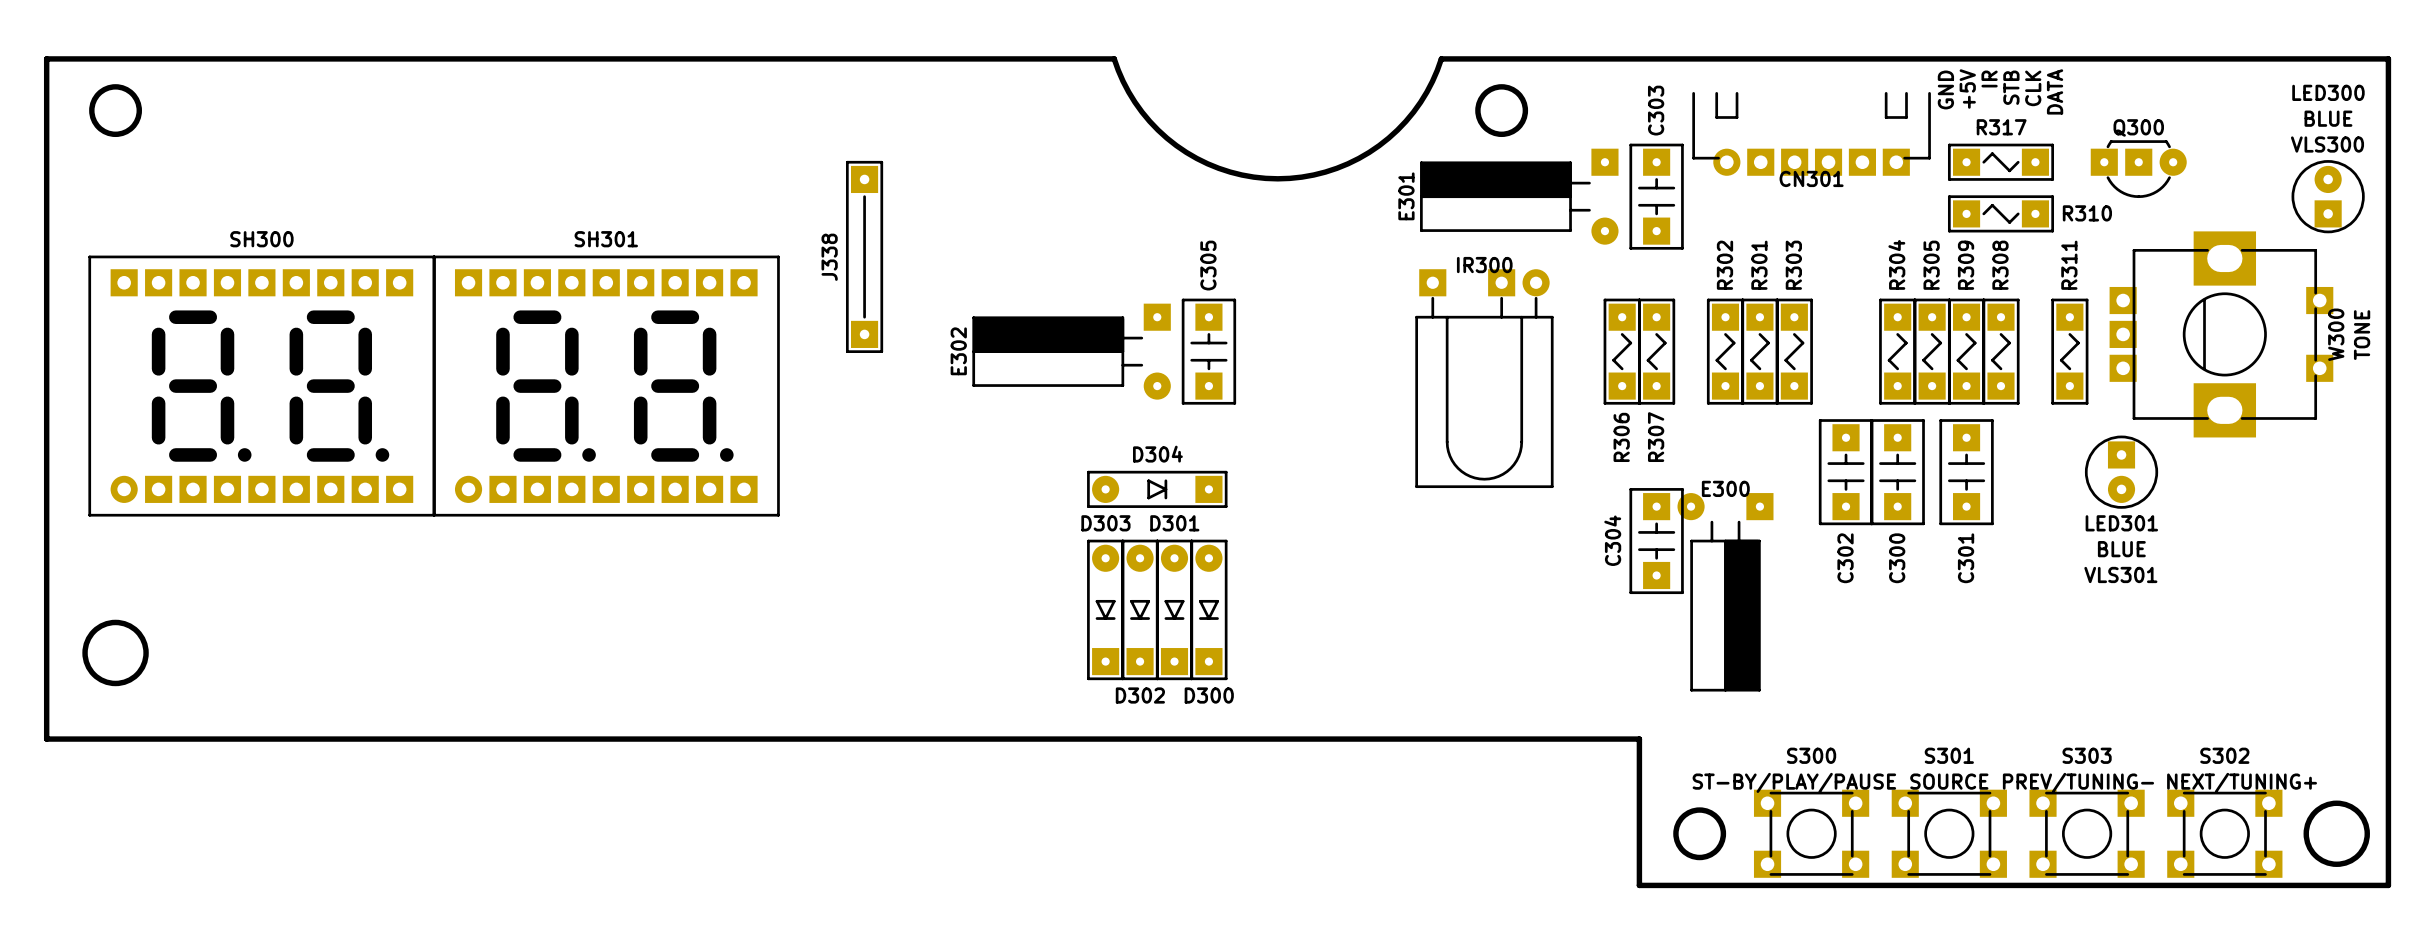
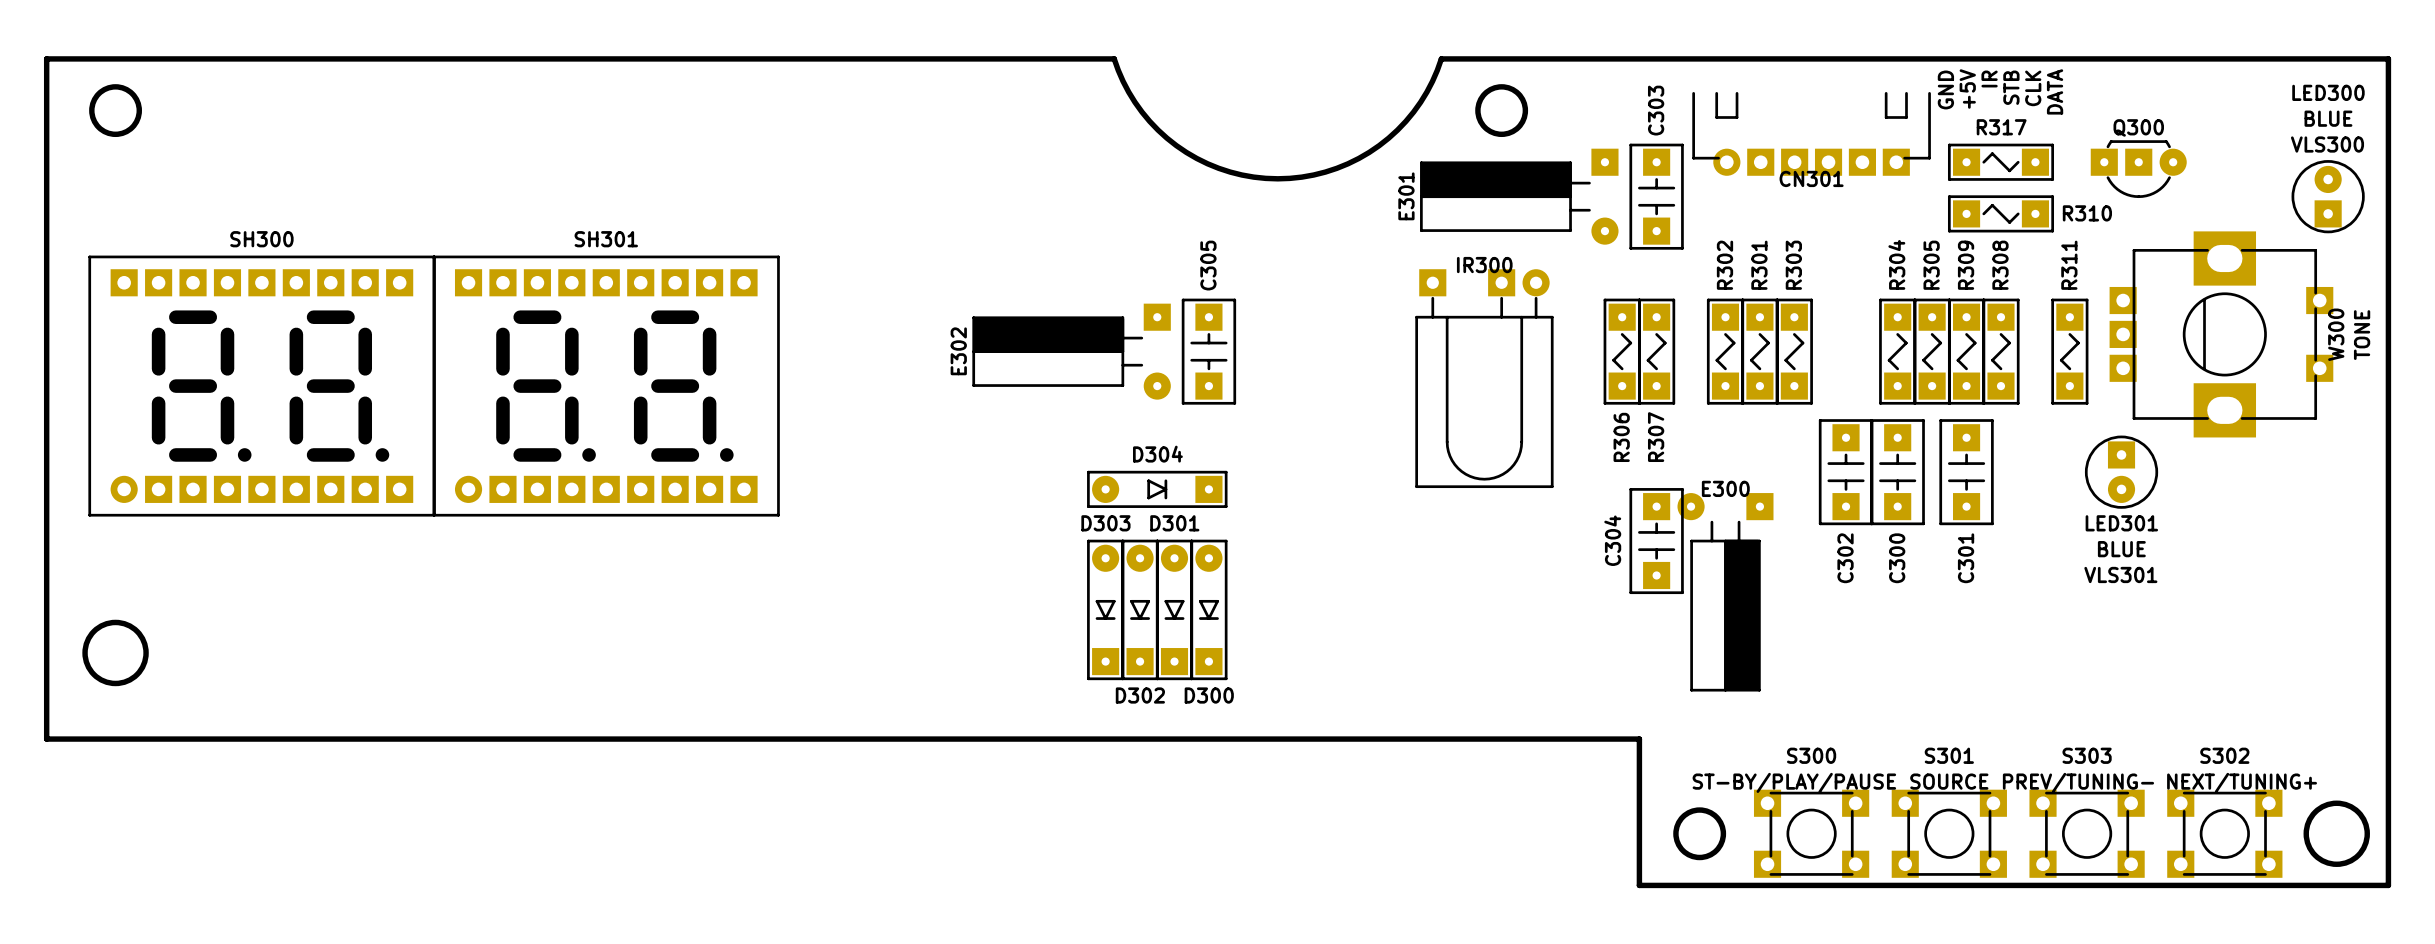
J338: (864, 256) -> none

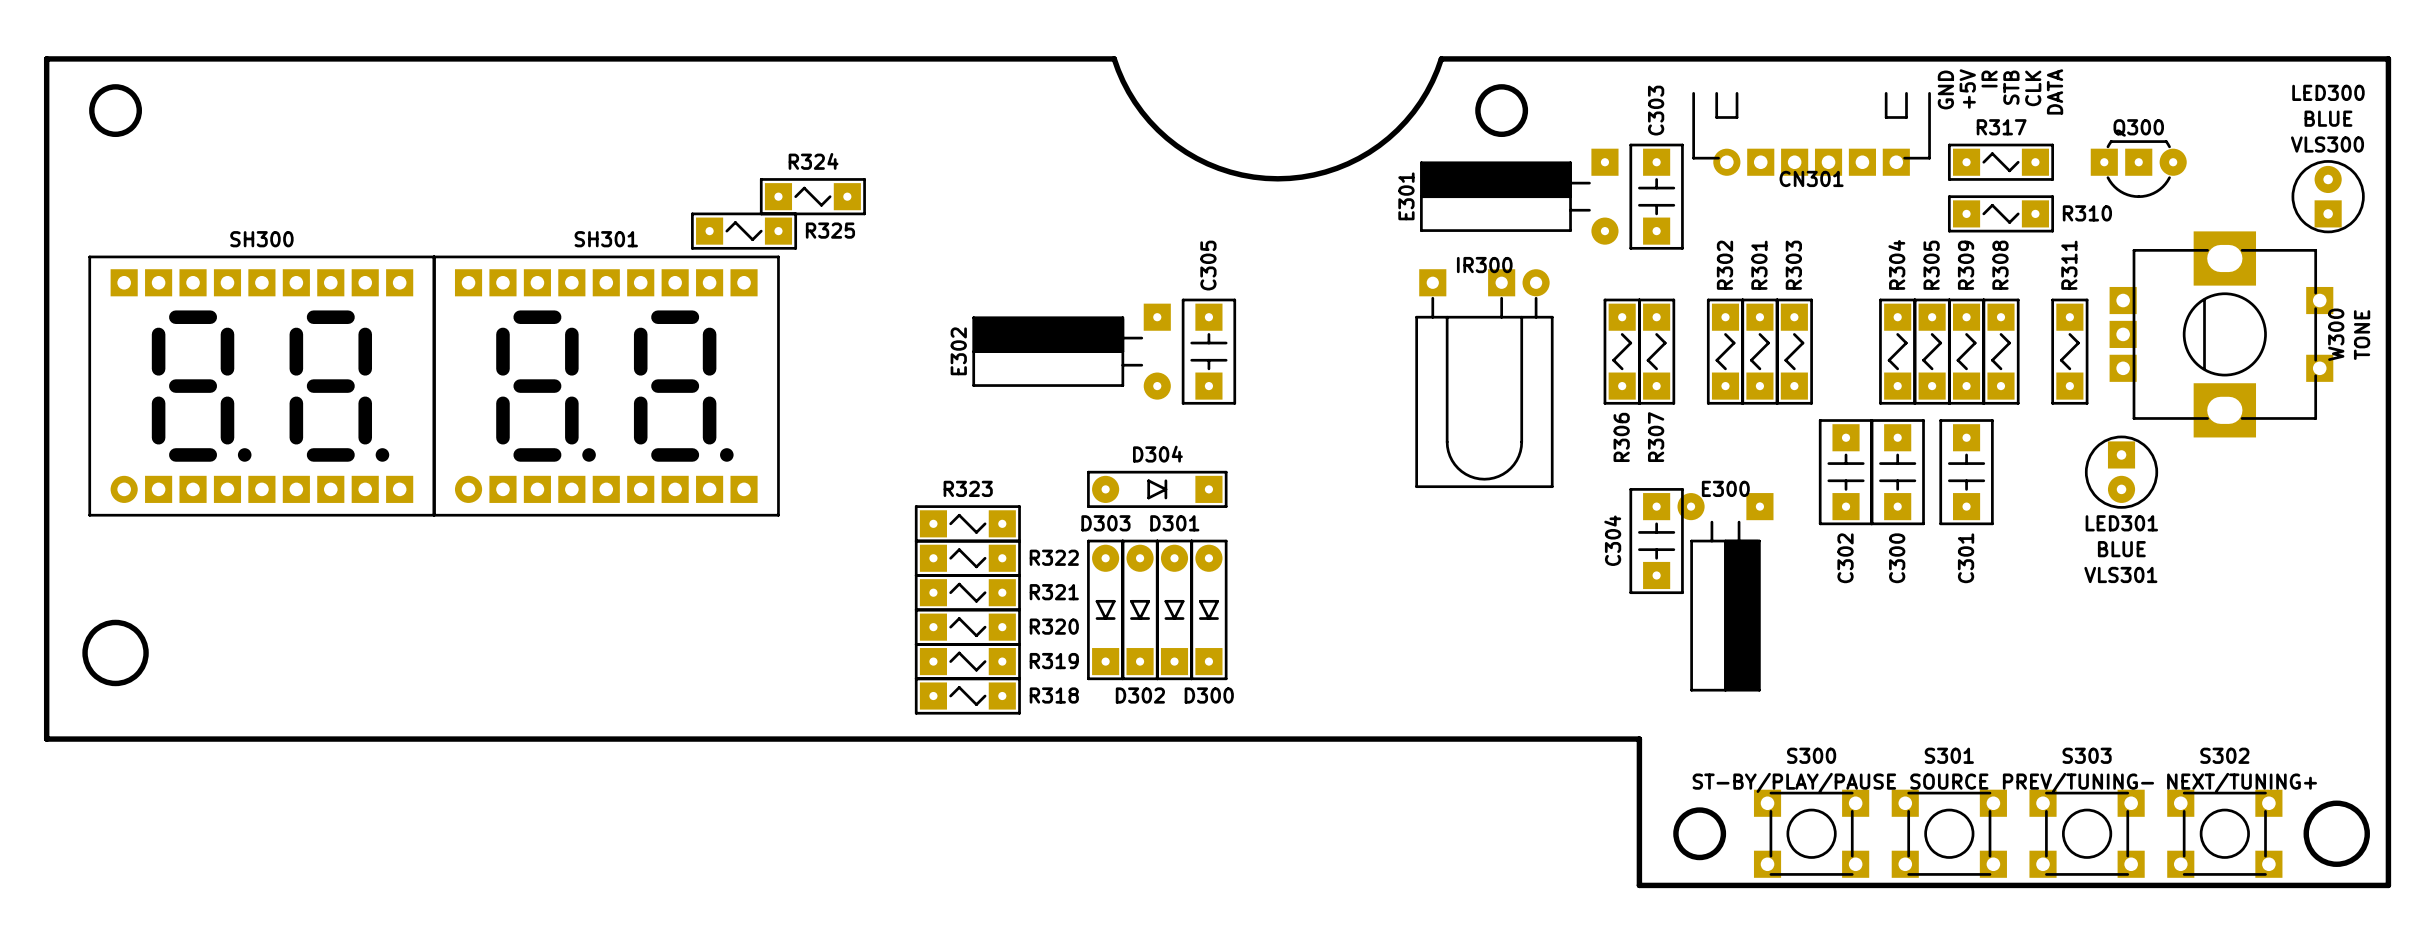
R324: none -> (812, 196)
R325: none -> (744, 231)
R323: none -> (967, 523)
R322: none -> (967, 558)
R321: none -> (967, 592)
R320: none -> (967, 627)
R319: none -> (967, 661)
R318: none -> (967, 696)

